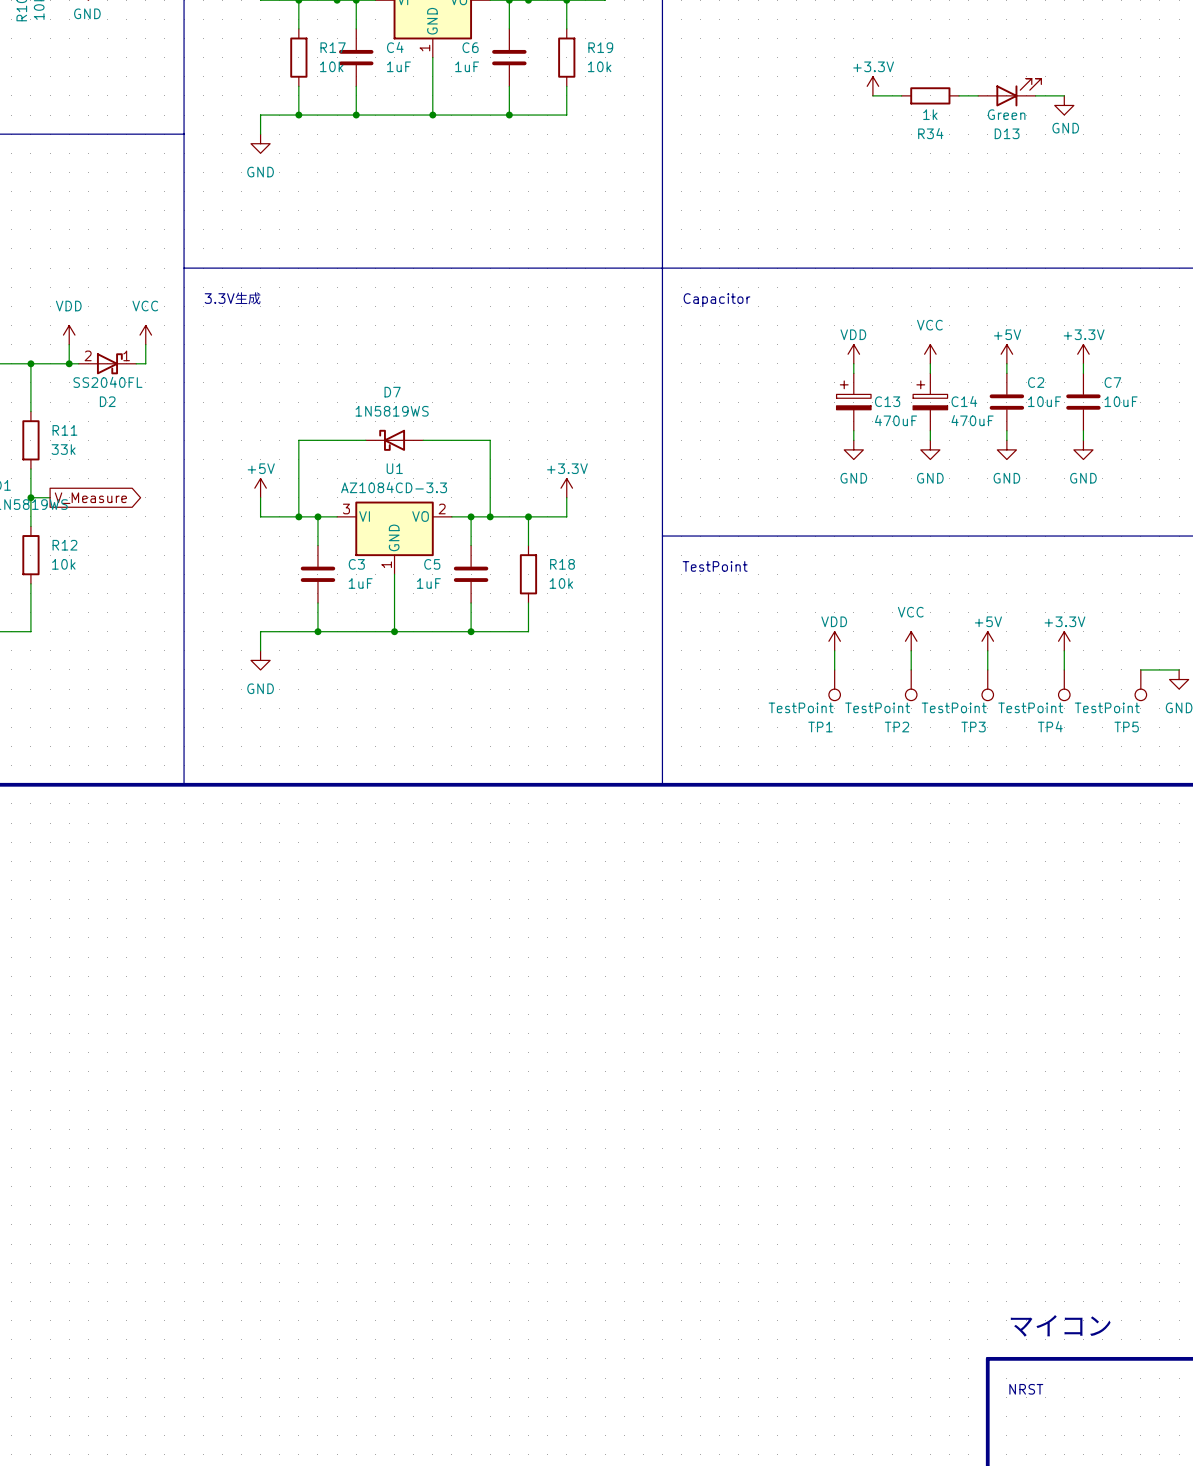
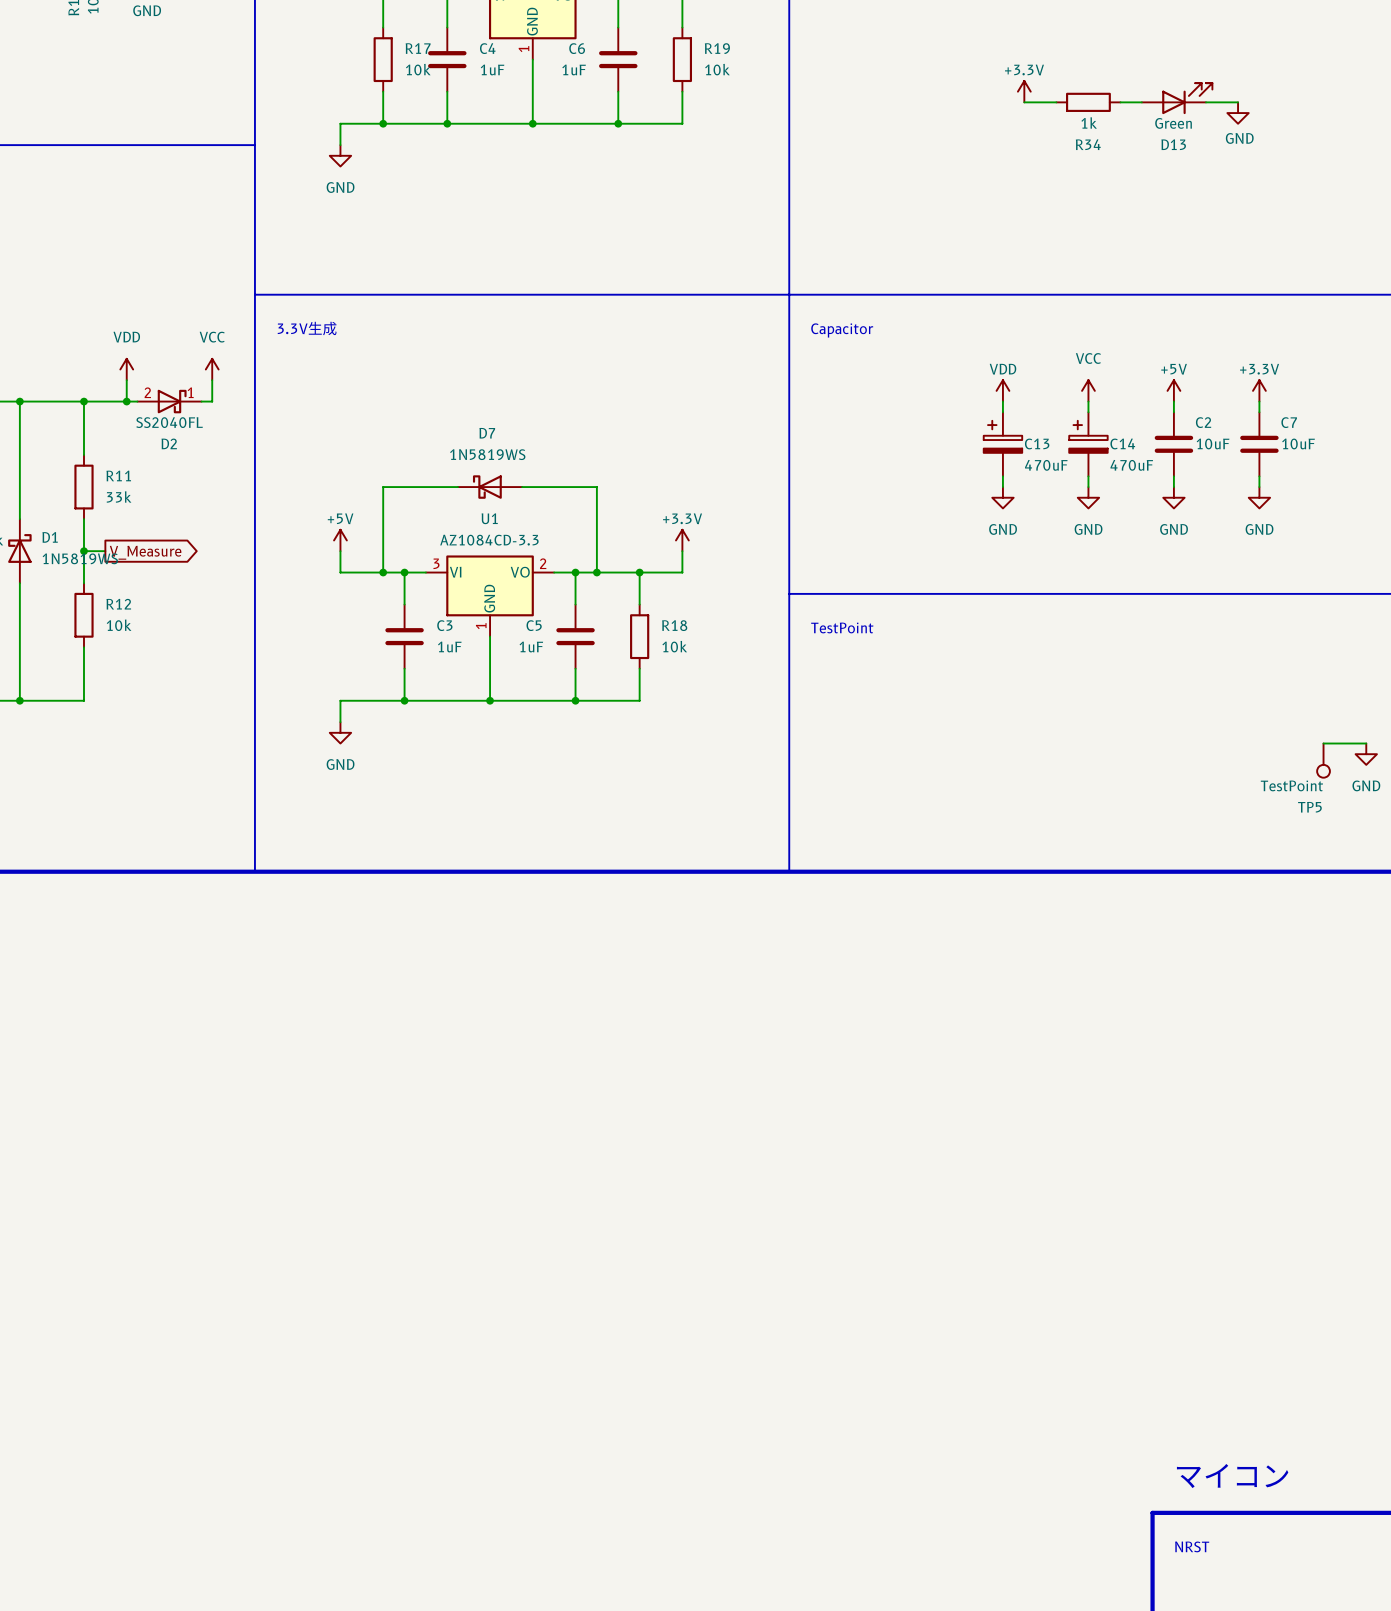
power symbol: VDD (834, 641) -> none
power symbol: VCC (911, 641) -> none
power symbol: +5V (987, 641) -> none
power symbol: +3.3V (1064, 641) -> none
wire: (834, 650) (834, 669) -> none
wire: (911, 650) (911, 669) -> none
wire: (987, 650) (987, 669) -> none
wire: (1064, 650) (1064, 669) -> none
TP1: TestPoint (834, 685) -> none
TP2: TestPoint (911, 685) -> none
TP3: TestPoint (987, 685) -> none
TP4: TestPoint (1064, 685) -> none

